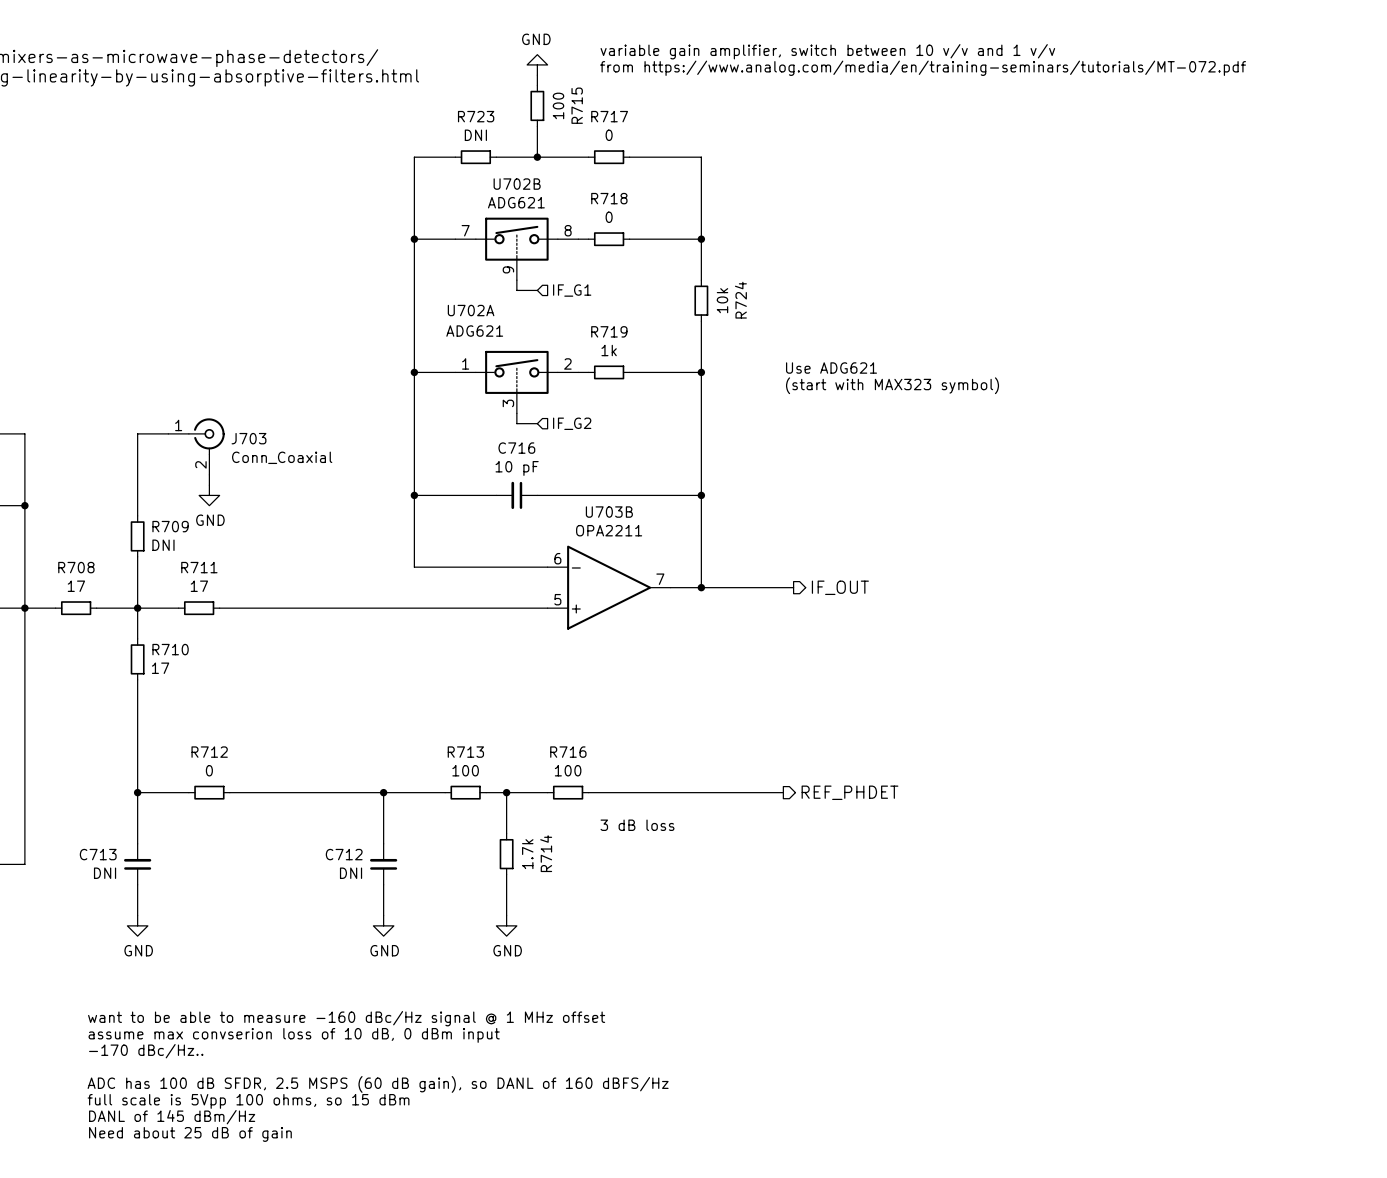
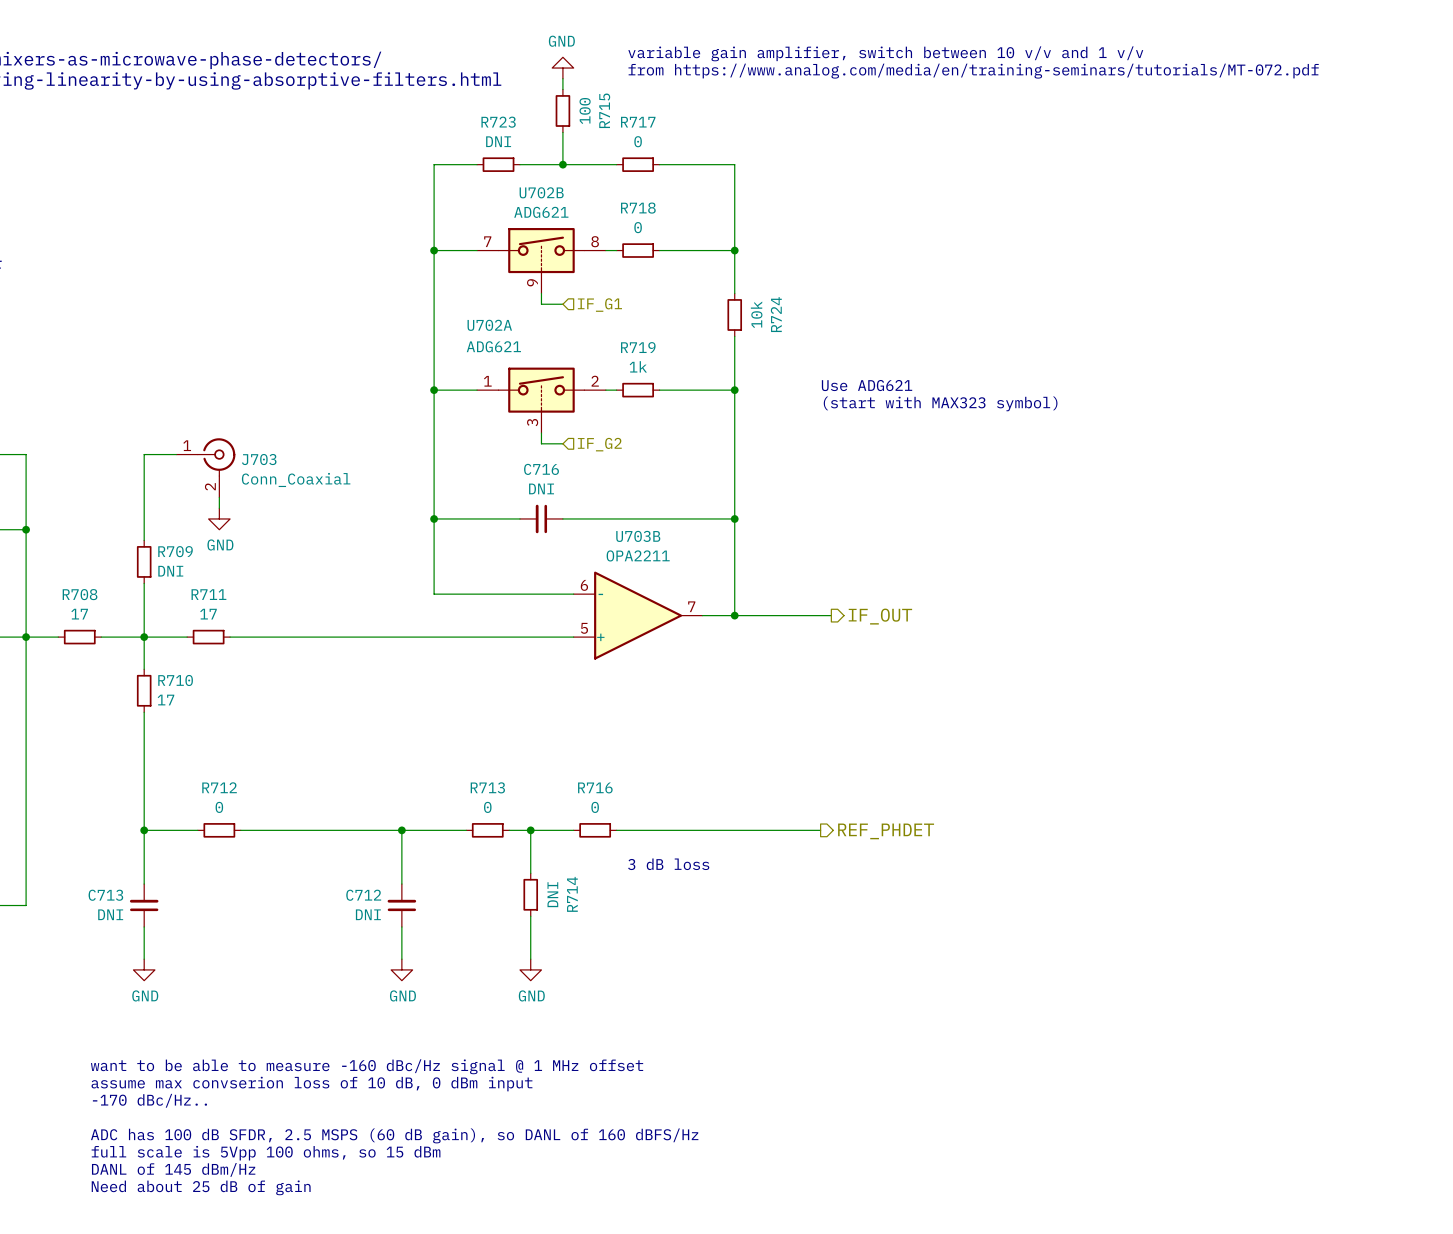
C716 value: 10 pF (517, 468) -> DNI (541, 488)
R713 value: 100 (465, 770) -> 0 (487, 807)
R716 value: 100 (568, 770) -> 0 (595, 807)
R714 value: 1.7k (527, 854) -> DNI (552, 894)

